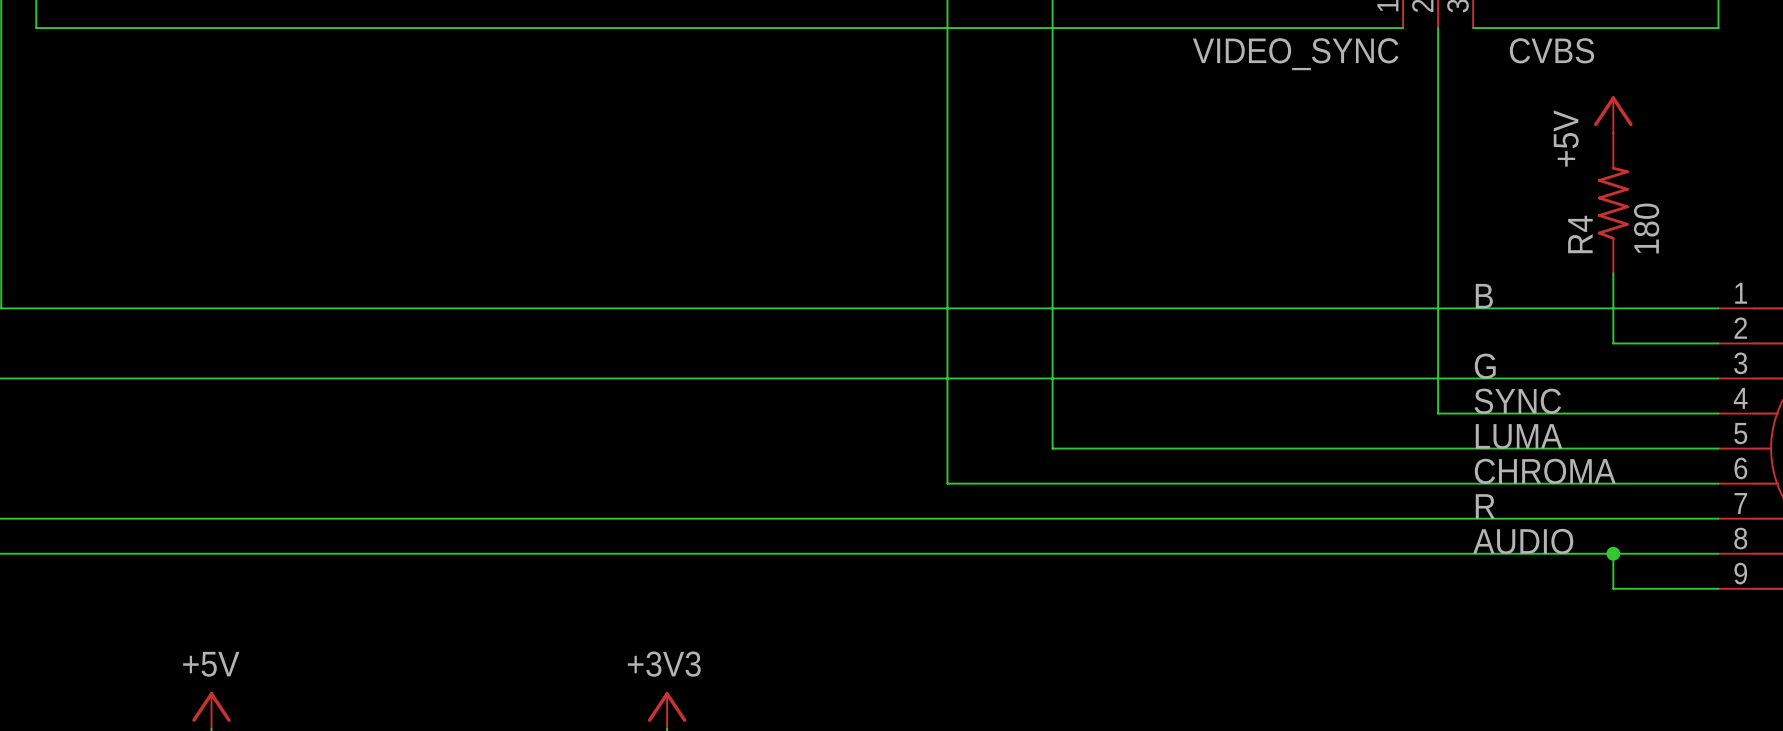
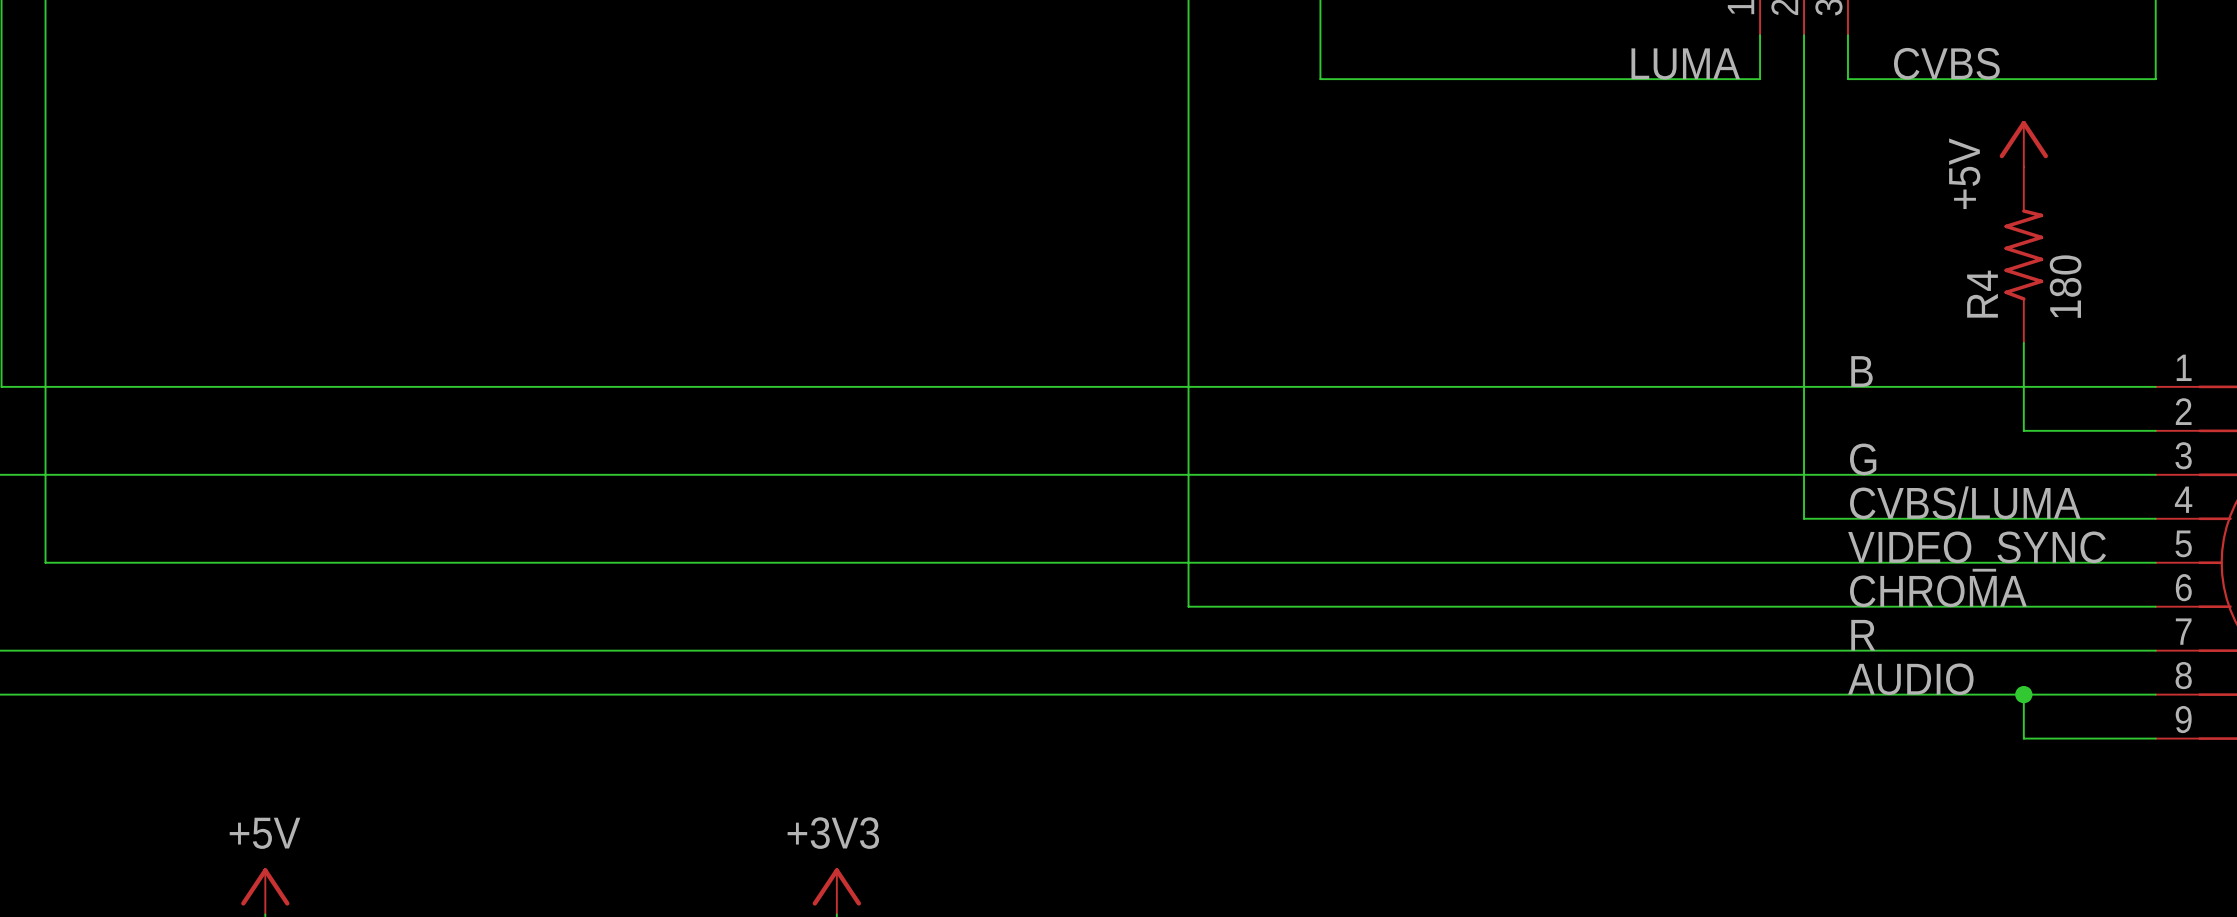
wire: (36, 28) (1403, 28) -> (45, 35) (45, 562) (1320, 562)
wire: (1473, 28) (1718, 28) -> (1847, 35) (1847, 79) (2155, 79) (2155, 35)
label: none -> LUMA (1685, 63)
label: VIDEO_SYNC (1295, 54) -> none
wire: (1052, 63) (1052, 448) -> (1320, 79) (1760, 79) (1760, 35)
label: SYNC (1517, 401) -> CVBS/LUMA (1965, 502)
label: LUMA (1519, 436) -> VIDEO_SYNC (1977, 551)

